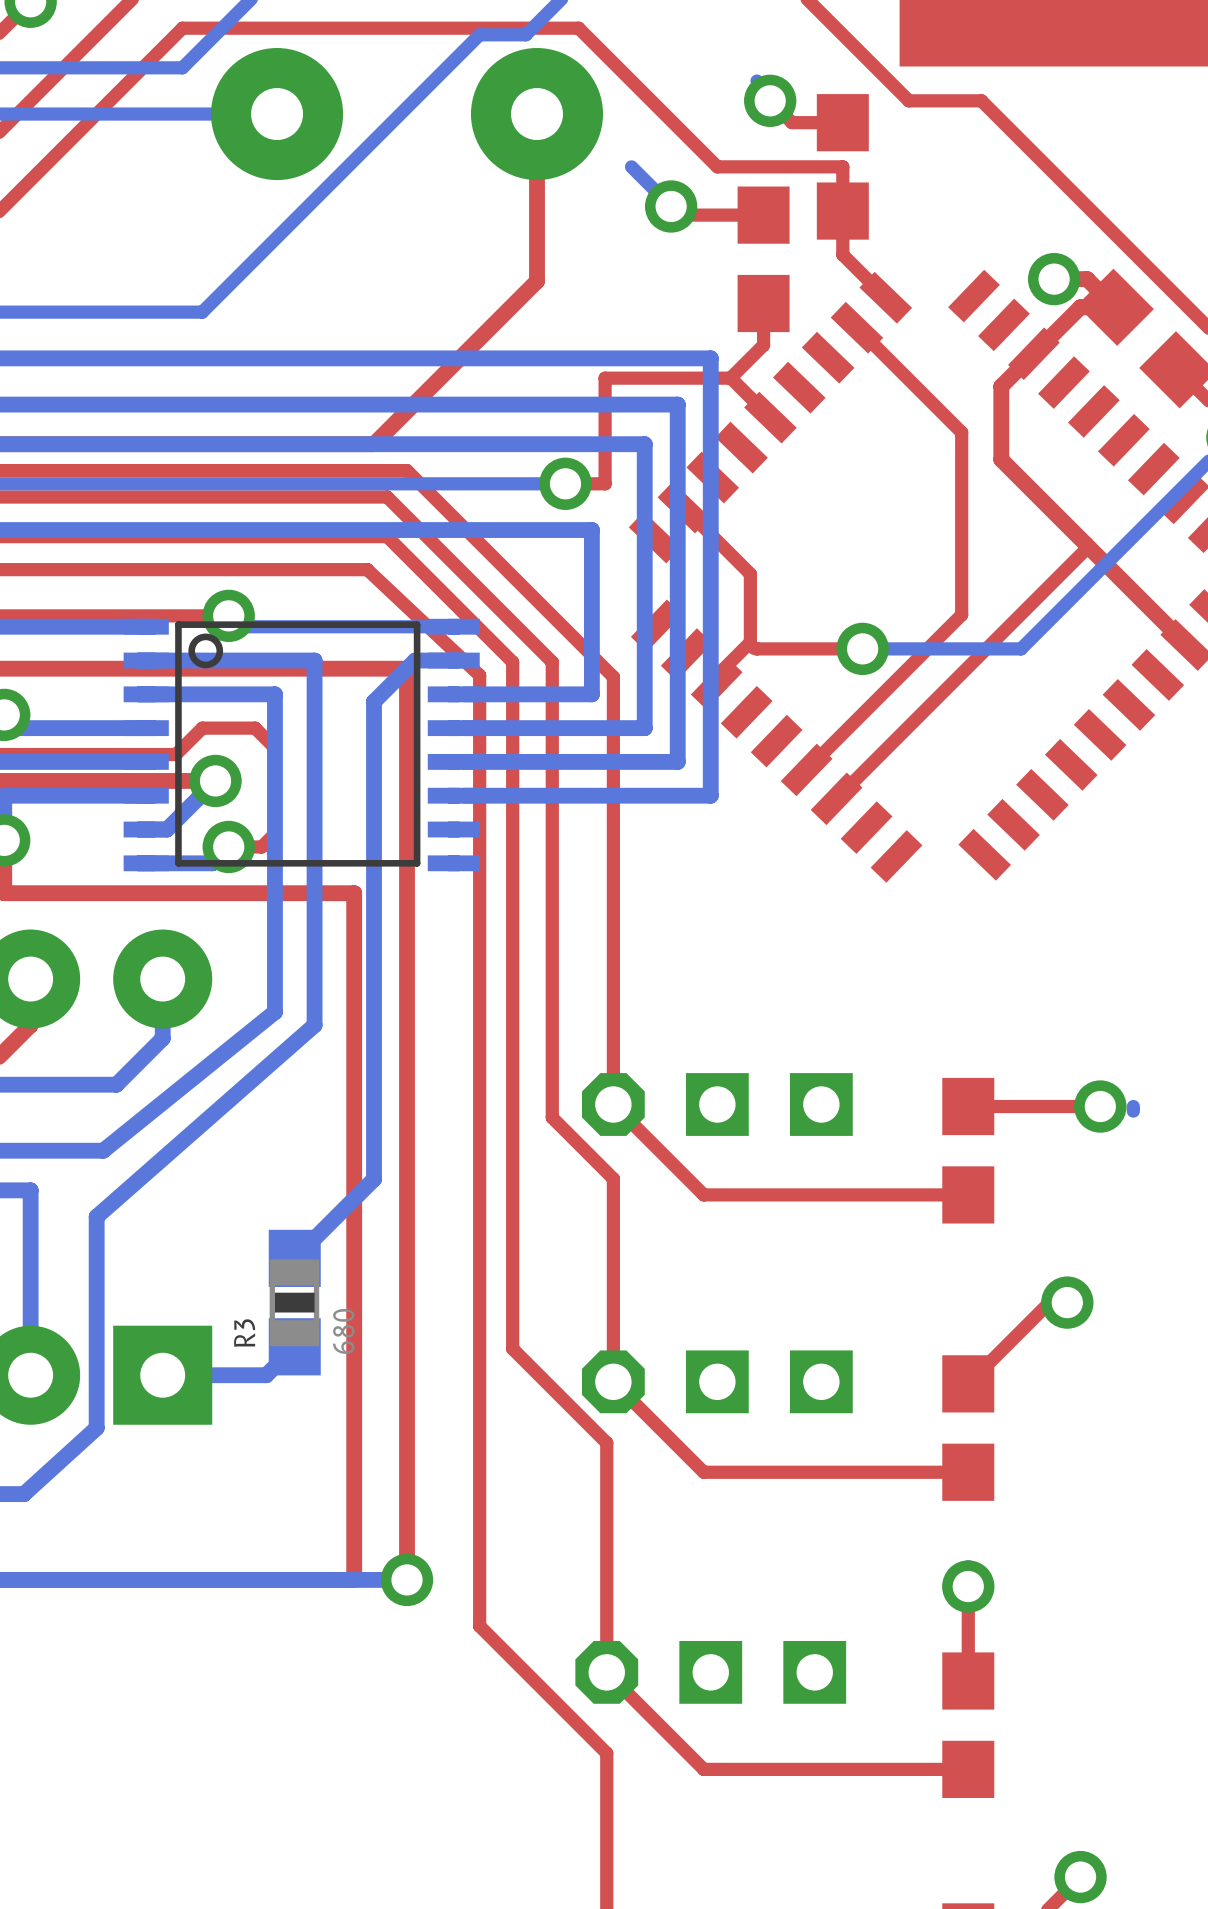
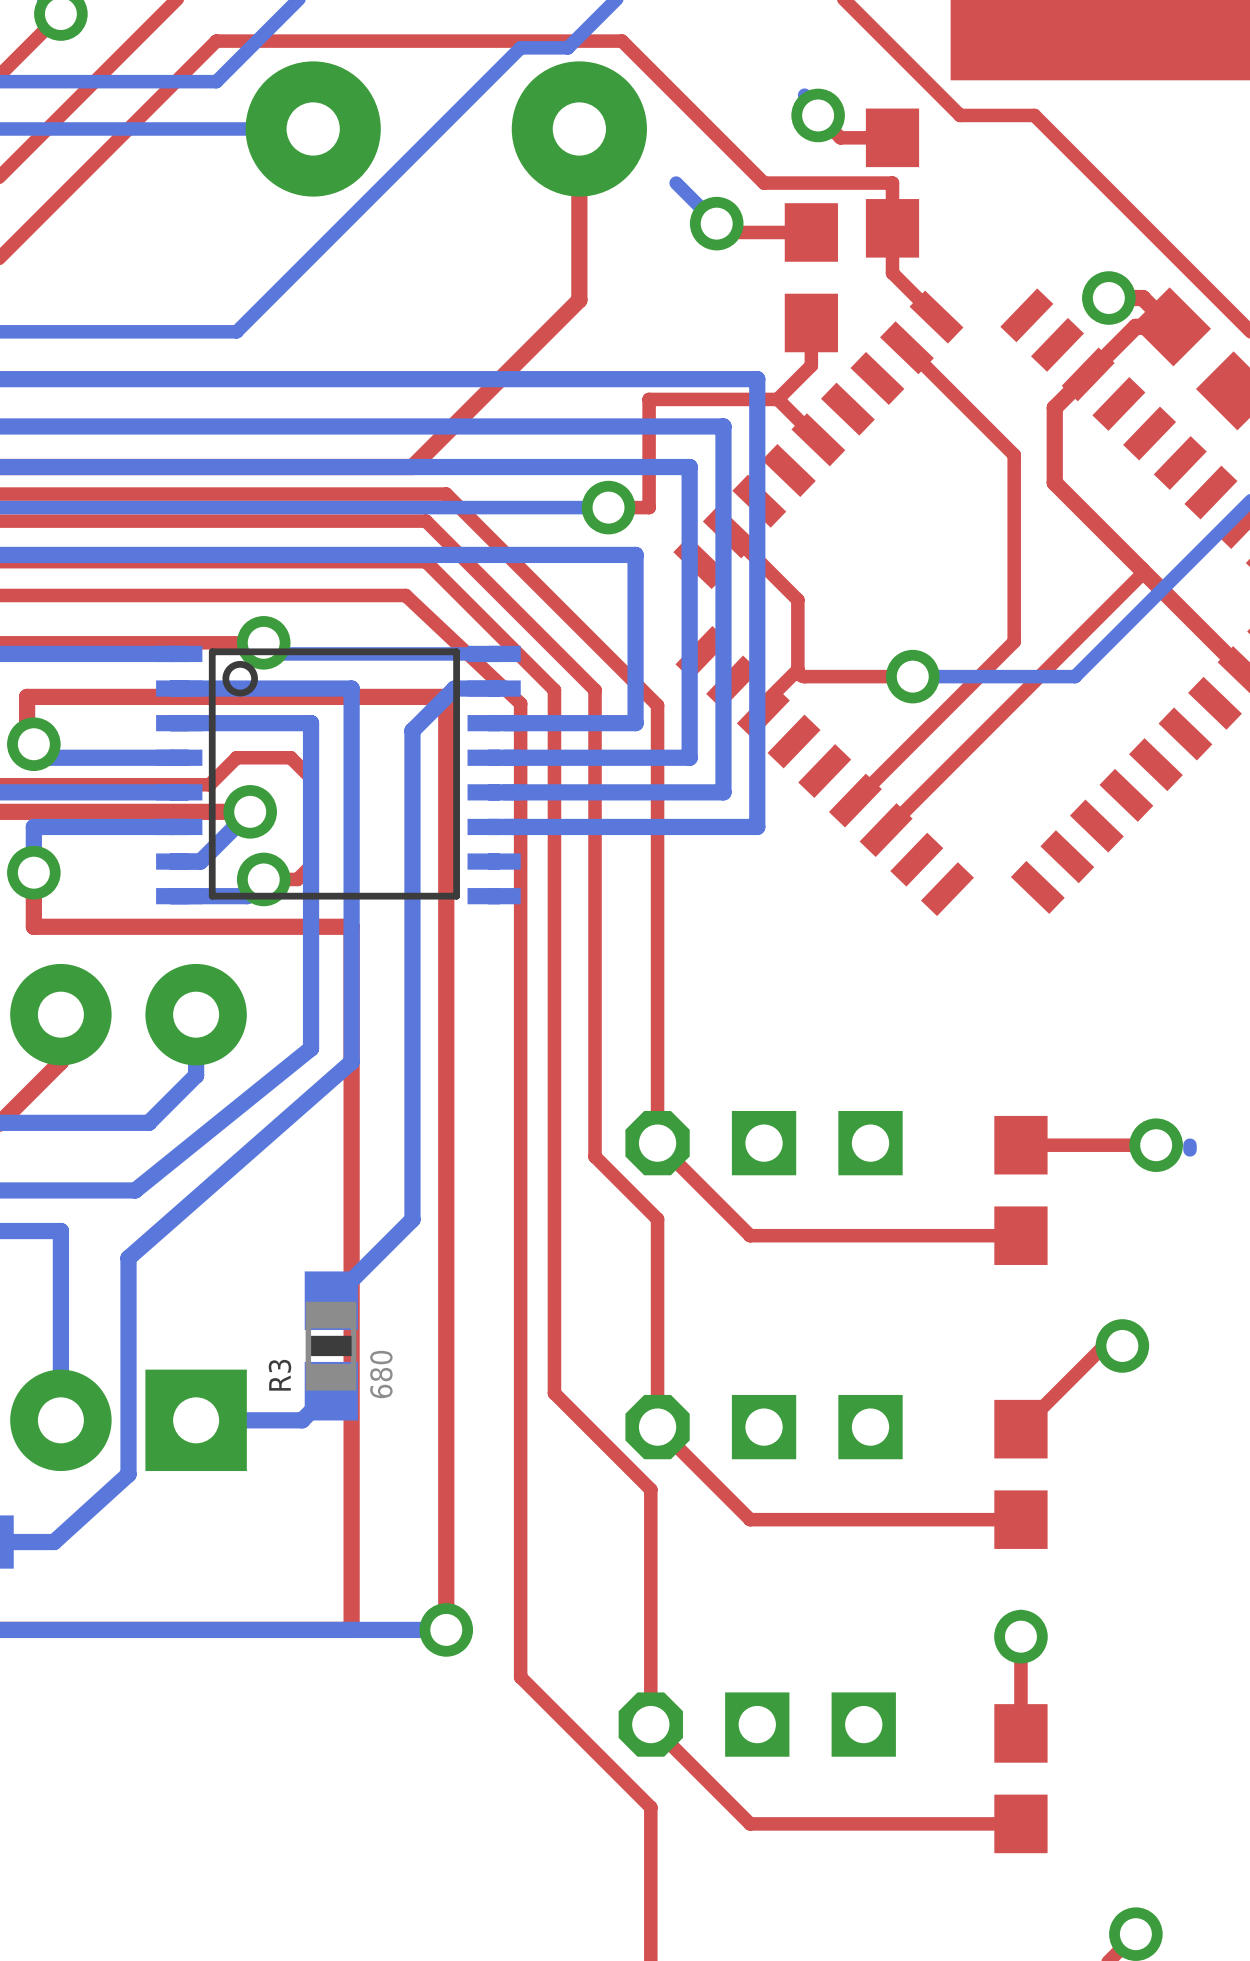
top track: (314, 893) (354, 893) (354, 1579) (314, 1579) -> (351, 926) (351, 1629)

